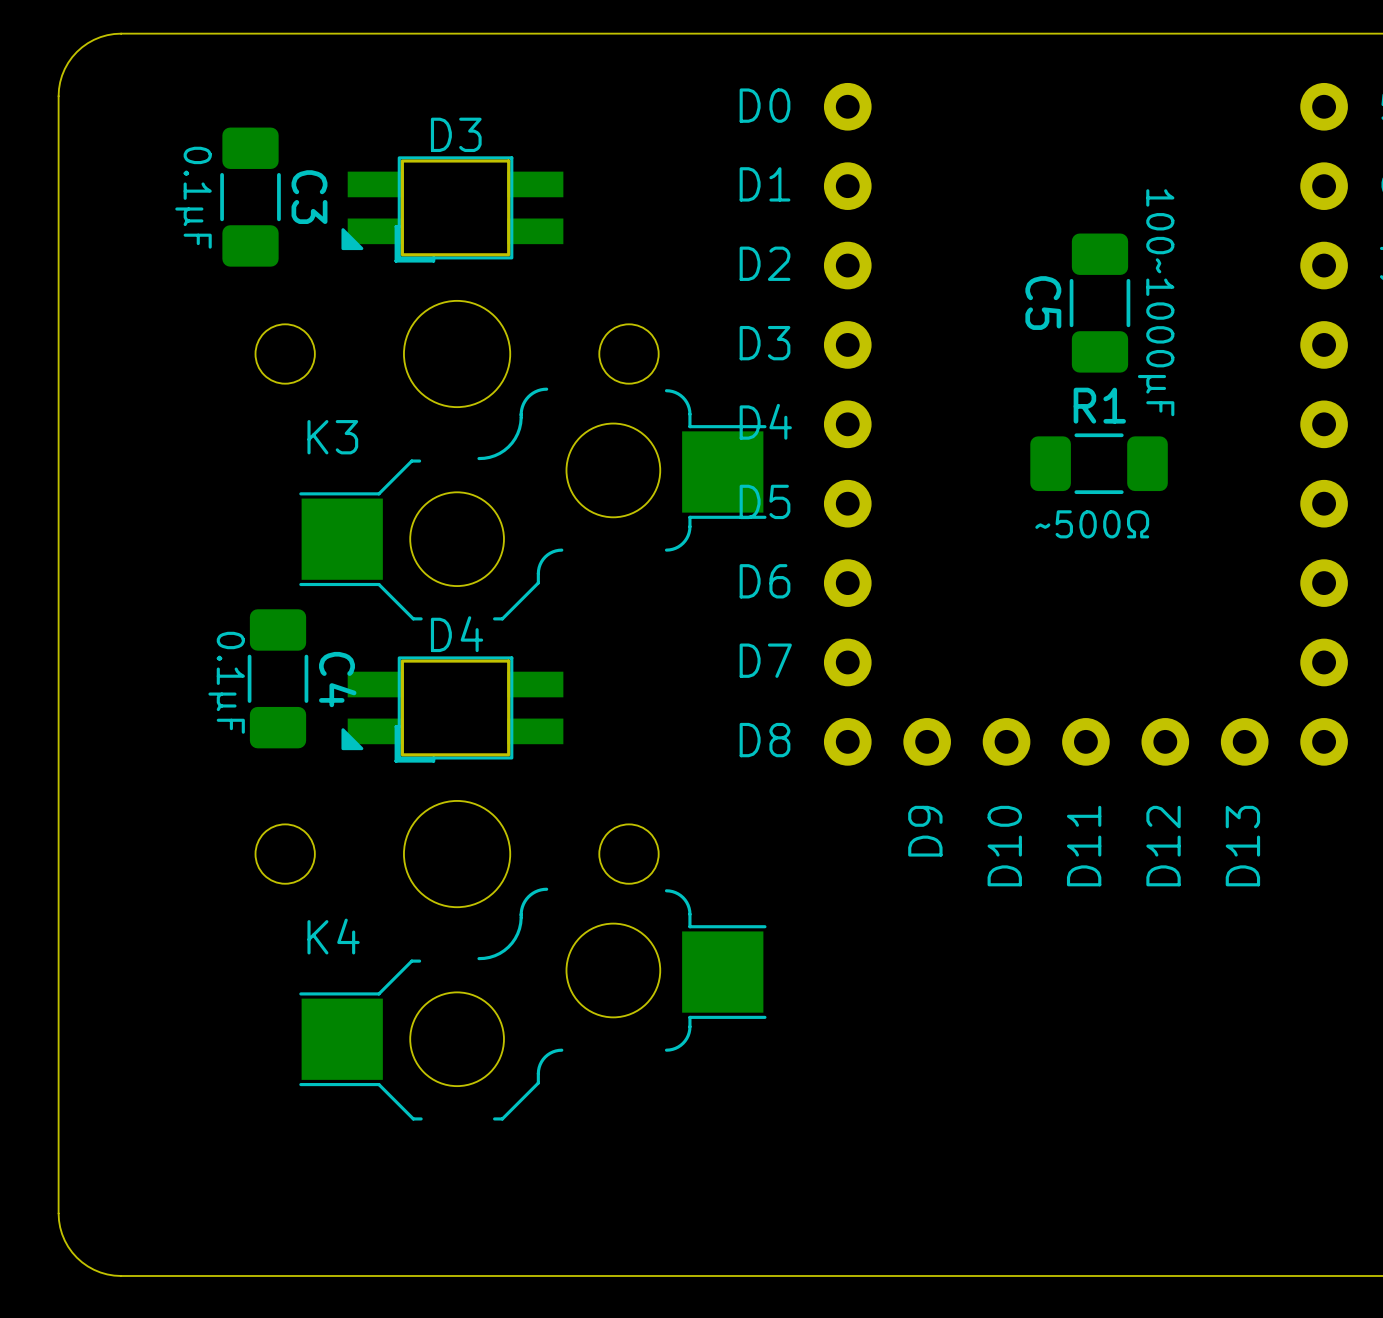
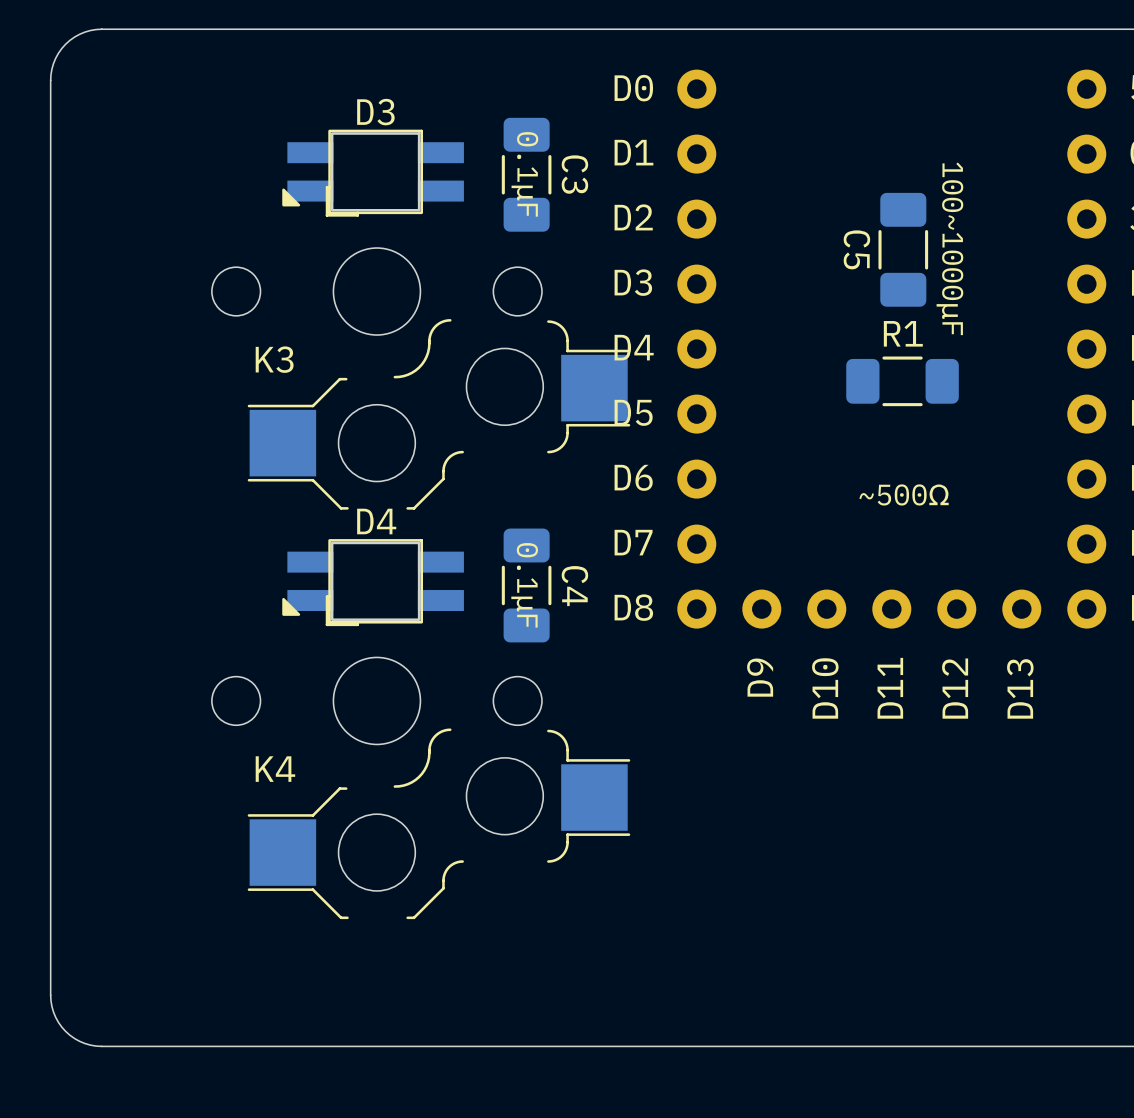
text: 0.1μF (193, 197) -> none
C3 position: (250, 197) -> (526, 174)
text: none -> 0.1μF (524, 174)
text position: ~500Ω (1092, 524) -> ~500Ω (904, 494)
C4 position: (278, 678) -> (526, 585)
text: 0.1μF (226, 682) -> none
text: none -> 0.1μF (524, 585)

